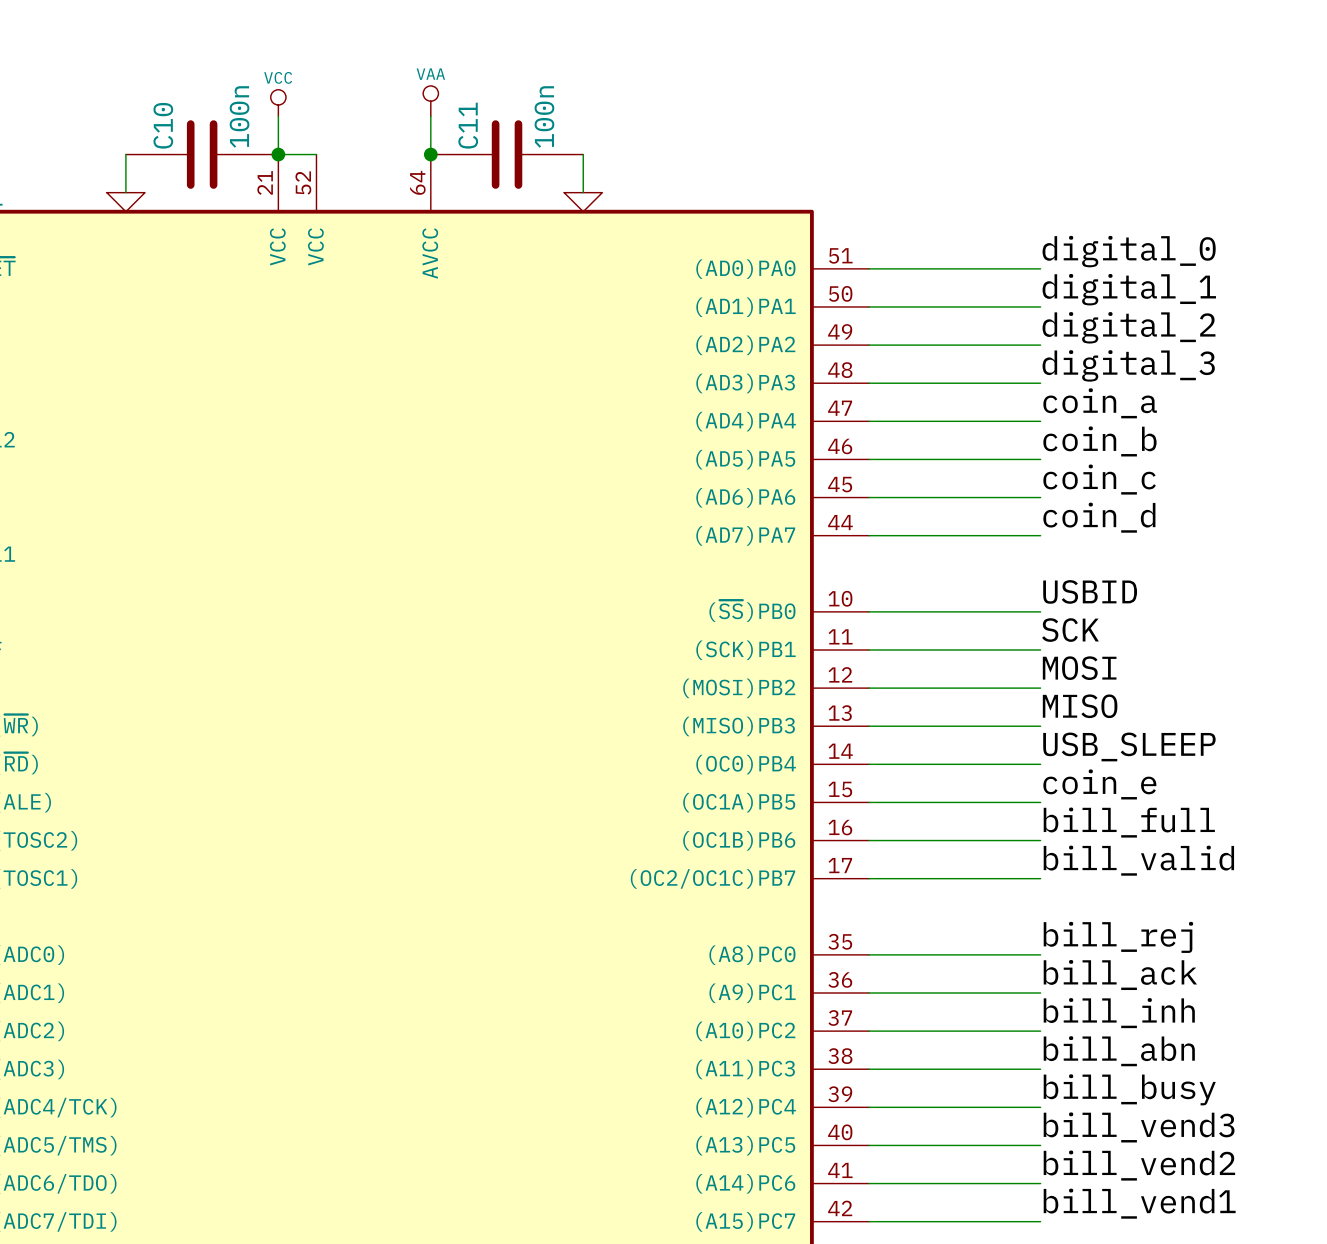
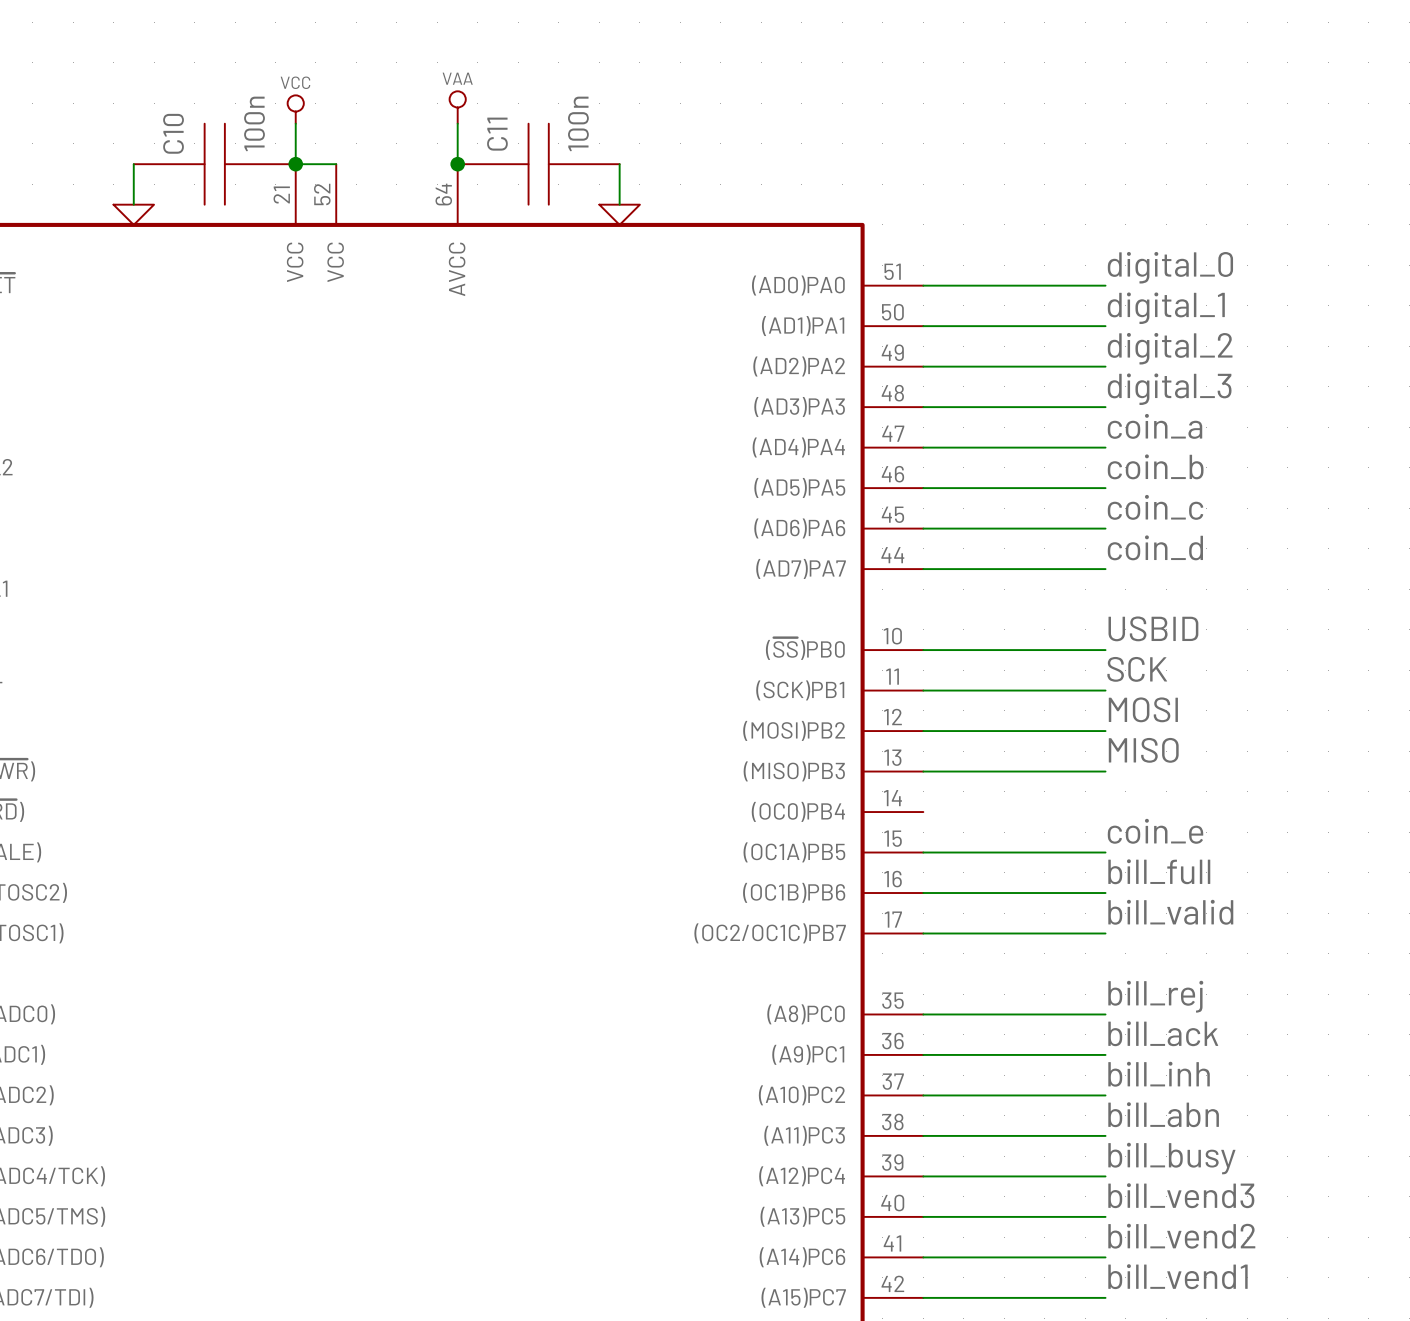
C10 symbol: [125, 120, 279, 189] -> [133, 123, 296, 205]
C11 symbol: [430, 120, 584, 189] -> [457, 123, 620, 205]
label: USB_SLEEP (1129, 746) -> none
wire: (869, 764) (1040, 764) -> none

